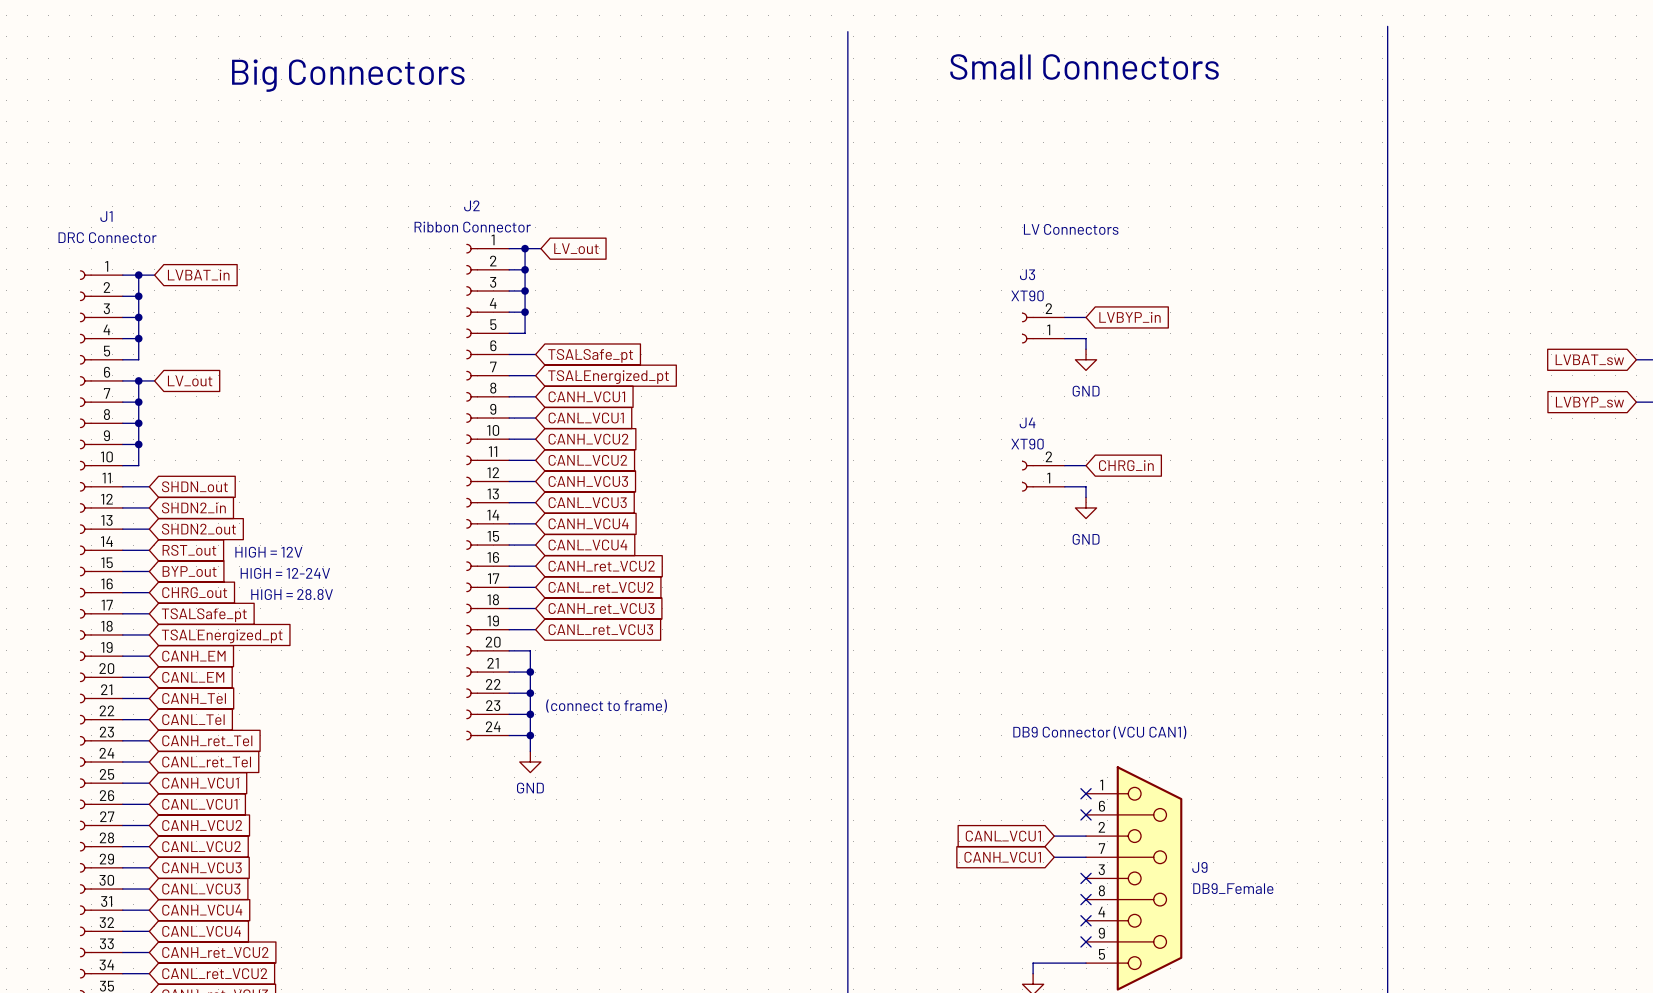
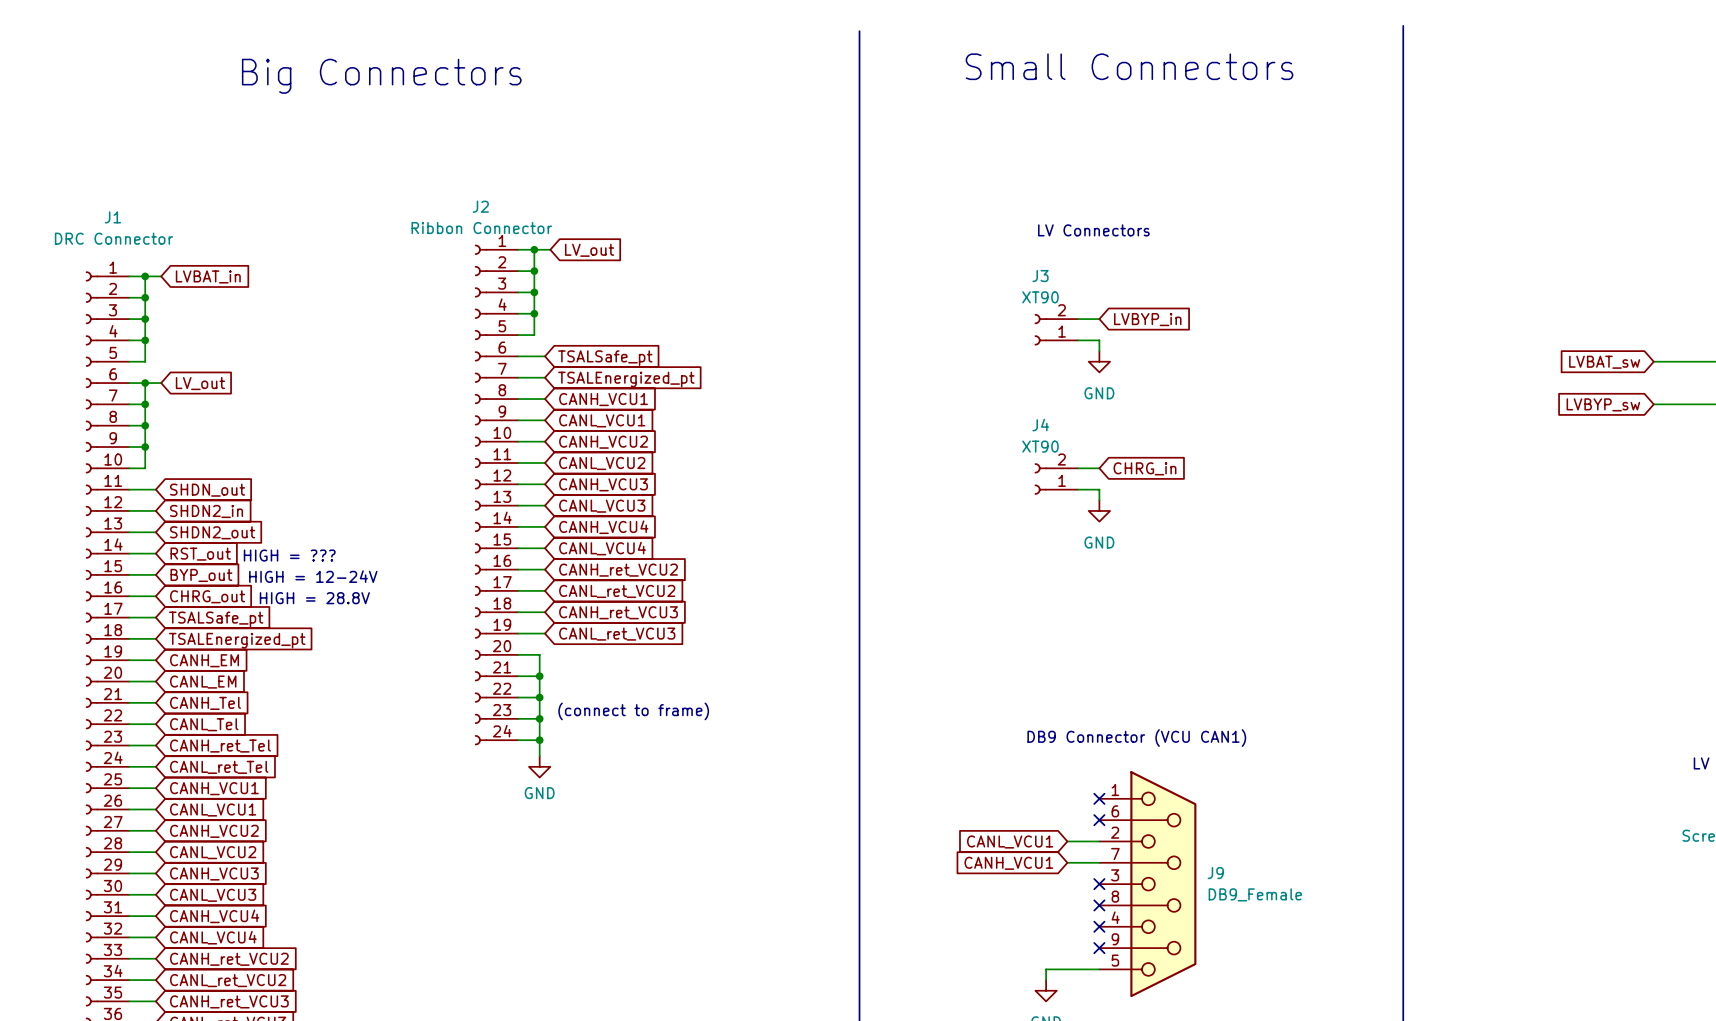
text: HIGH = 12V (268, 552) -> HIGH = ??? (289, 555)

